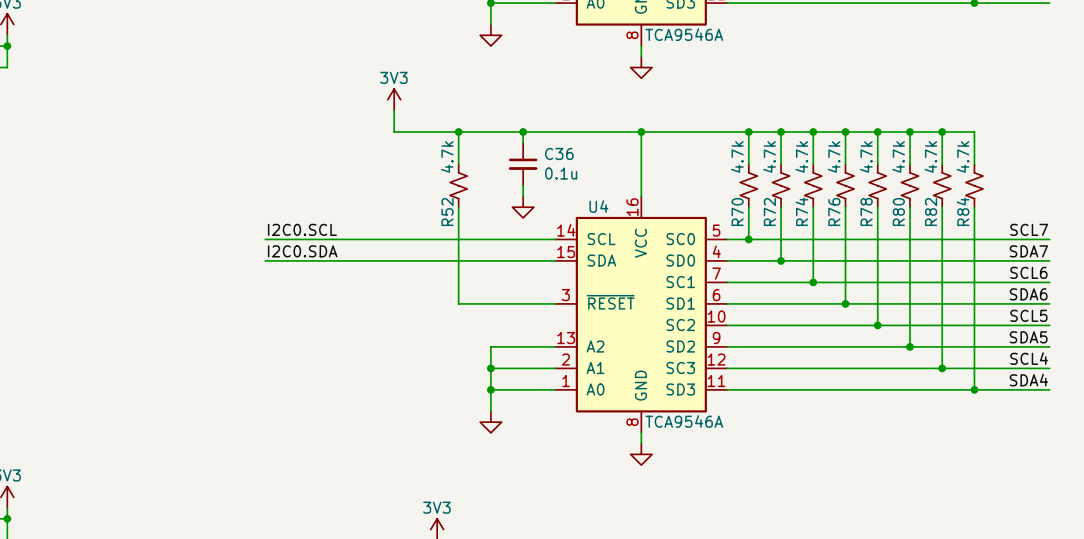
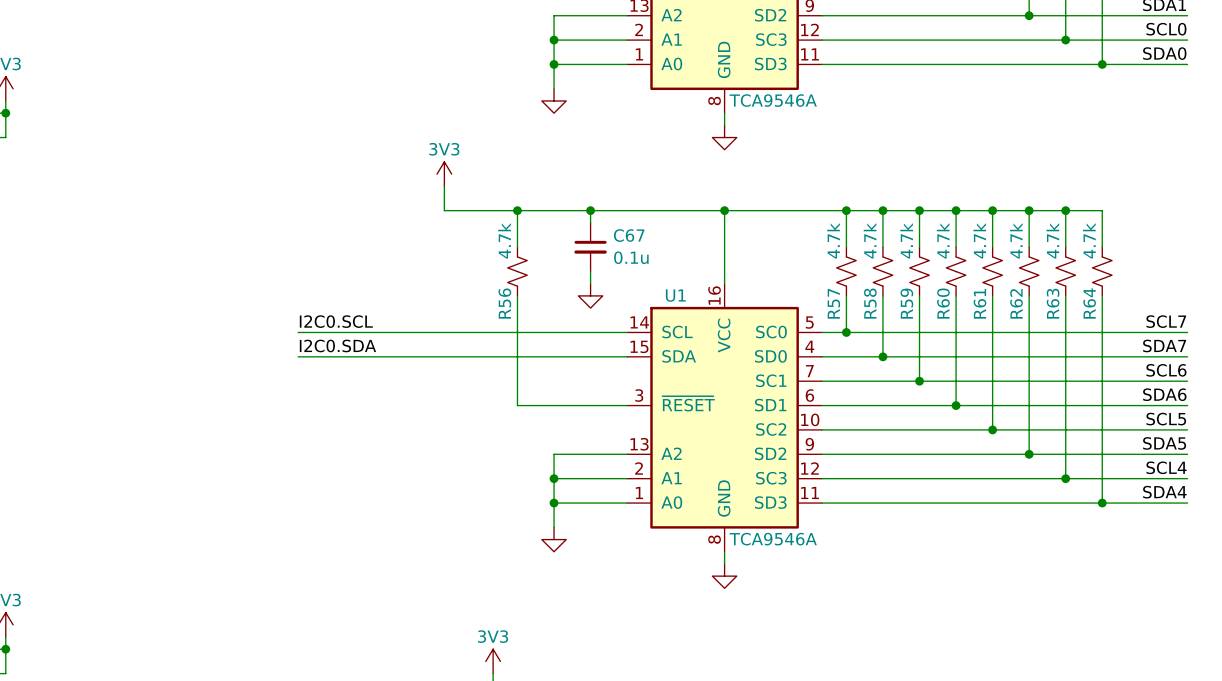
C36 name: C36 (559, 153) -> C67 (629, 235)
U4 name: U4 (598, 206) -> U1 (675, 295)
R74 name: R74 (801, 211) -> R59 (906, 303)
R84 name: R84 (963, 211) -> R64 (1089, 303)
R52 name: R52 (447, 212) -> R56 (504, 303)
R70 name: R70 (737, 212) -> R57 (833, 303)
R72 name: R72 (769, 212) -> R58 (870, 303)
R76 name: R76 (834, 212) -> R60 (943, 303)
R78 name: R78 (866, 212) -> R61 (979, 303)
R80 name: R80 (898, 212) -> R62 (1016, 303)
R82 name: R82 (931, 212) -> R63 (1053, 303)

